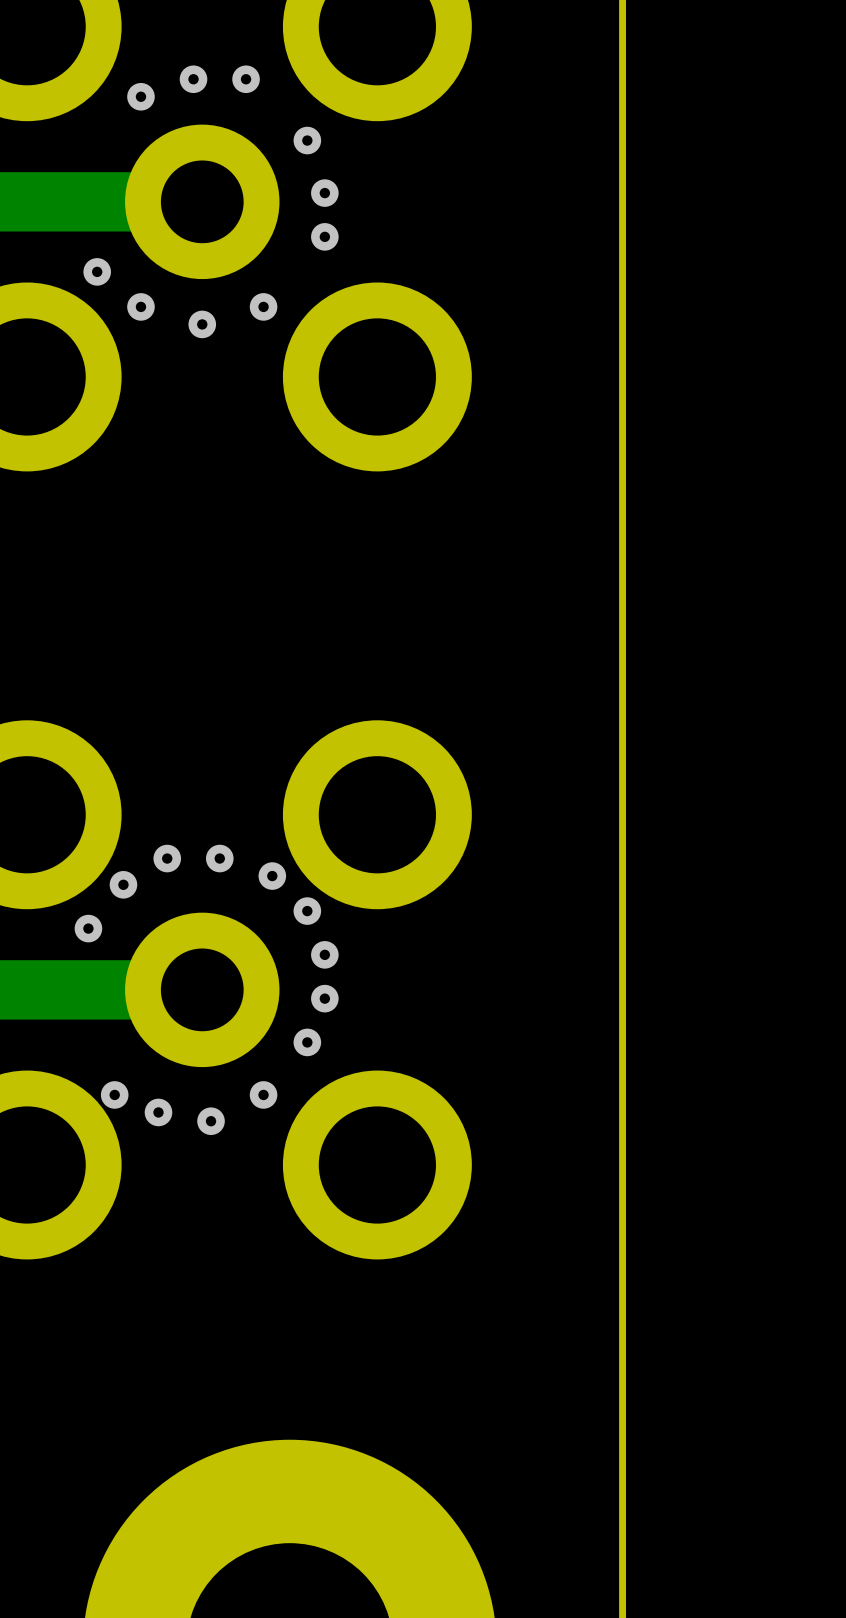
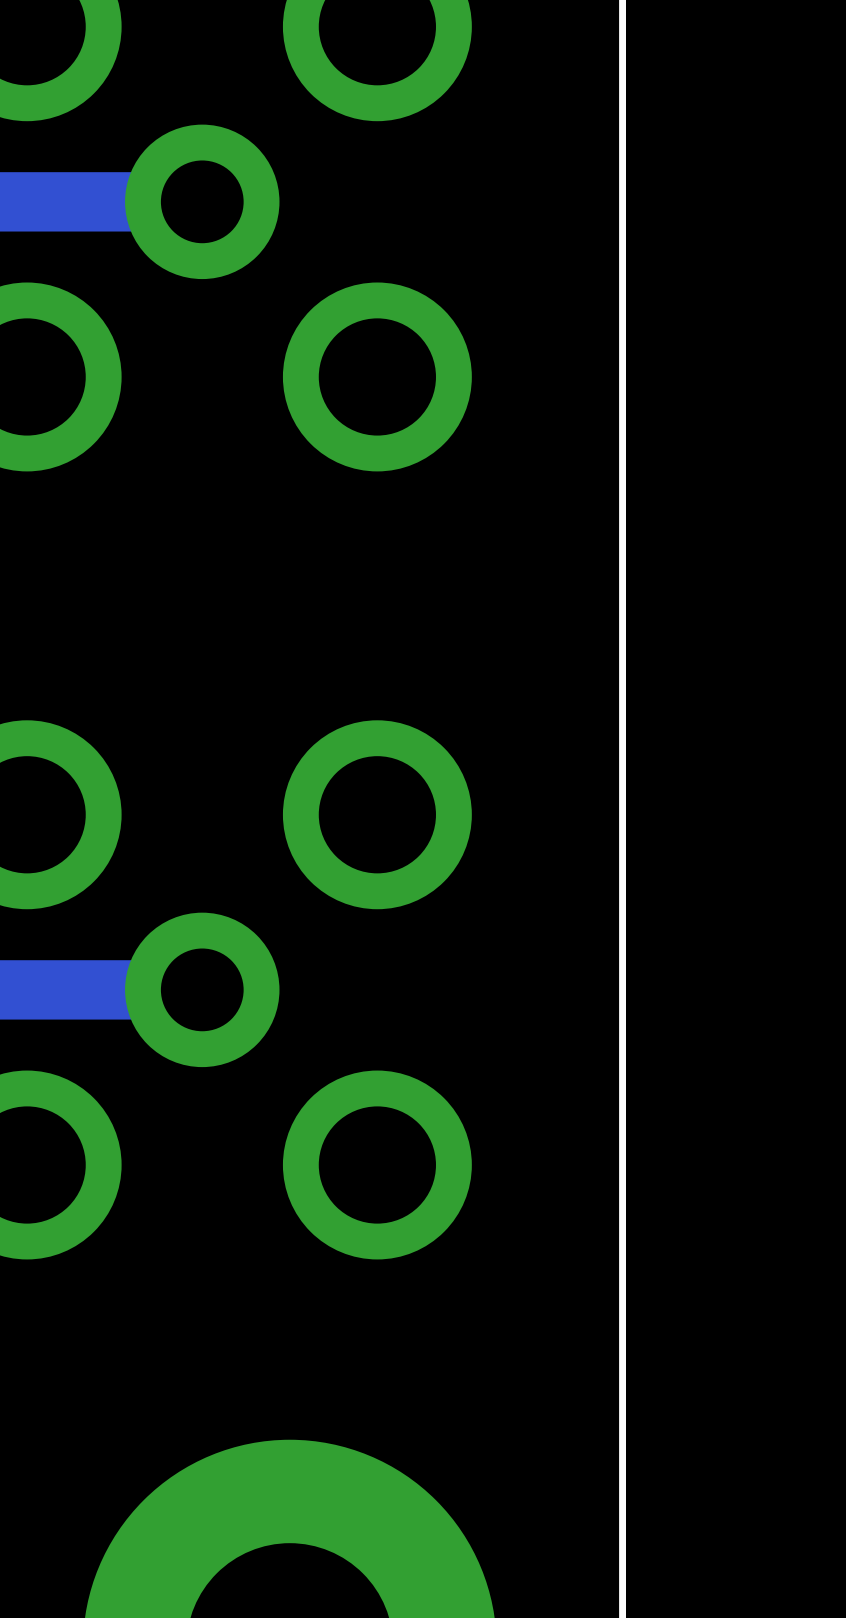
via: (193, 79) -> none
via: (246, 79) -> none
via: (140, 96) -> none
via: (307, 140) -> none
via: (324, 193) -> none
via: (324, 236) -> none
via: (97, 271) -> none
via: (140, 306) -> none
via: (263, 306) -> none
via: (202, 324) -> none
via: (167, 858) -> none
via: (219, 858) -> none
via: (272, 876) -> none
via: (123, 884) -> none
via: (307, 911) -> none
via: (88, 928) -> none
via: (324, 954) -> none
via: (324, 998) -> none
via: (307, 1042) -> none
via: (114, 1094) -> none
via: (263, 1094) -> none
via: (158, 1112) -> none
via: (211, 1121) -> none

